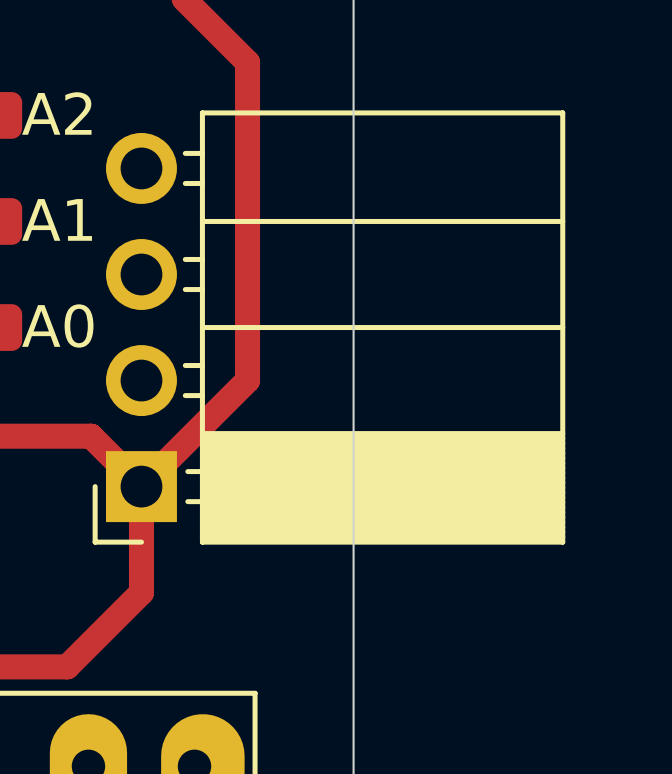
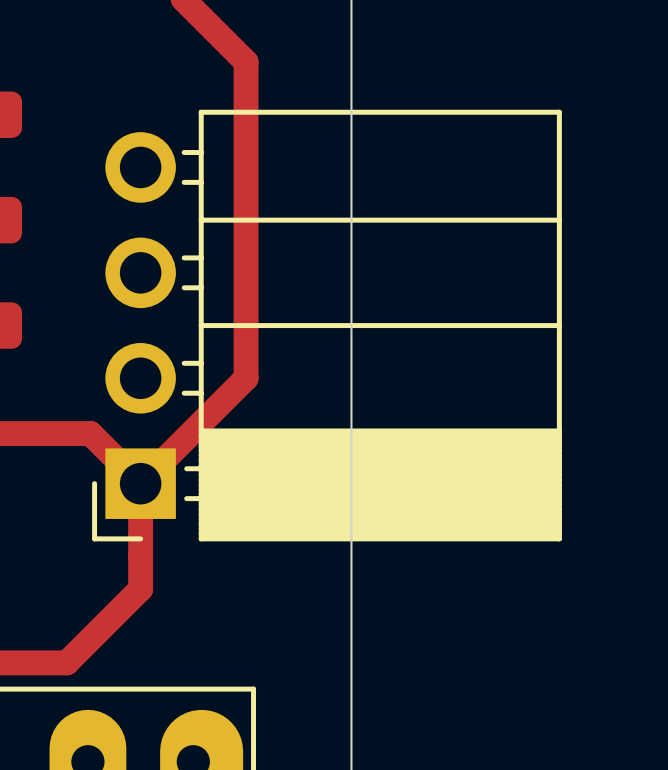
text: A2 (56, 113) -> none
text: A1 (57, 219) -> none
text: A0 (57, 325) -> none

